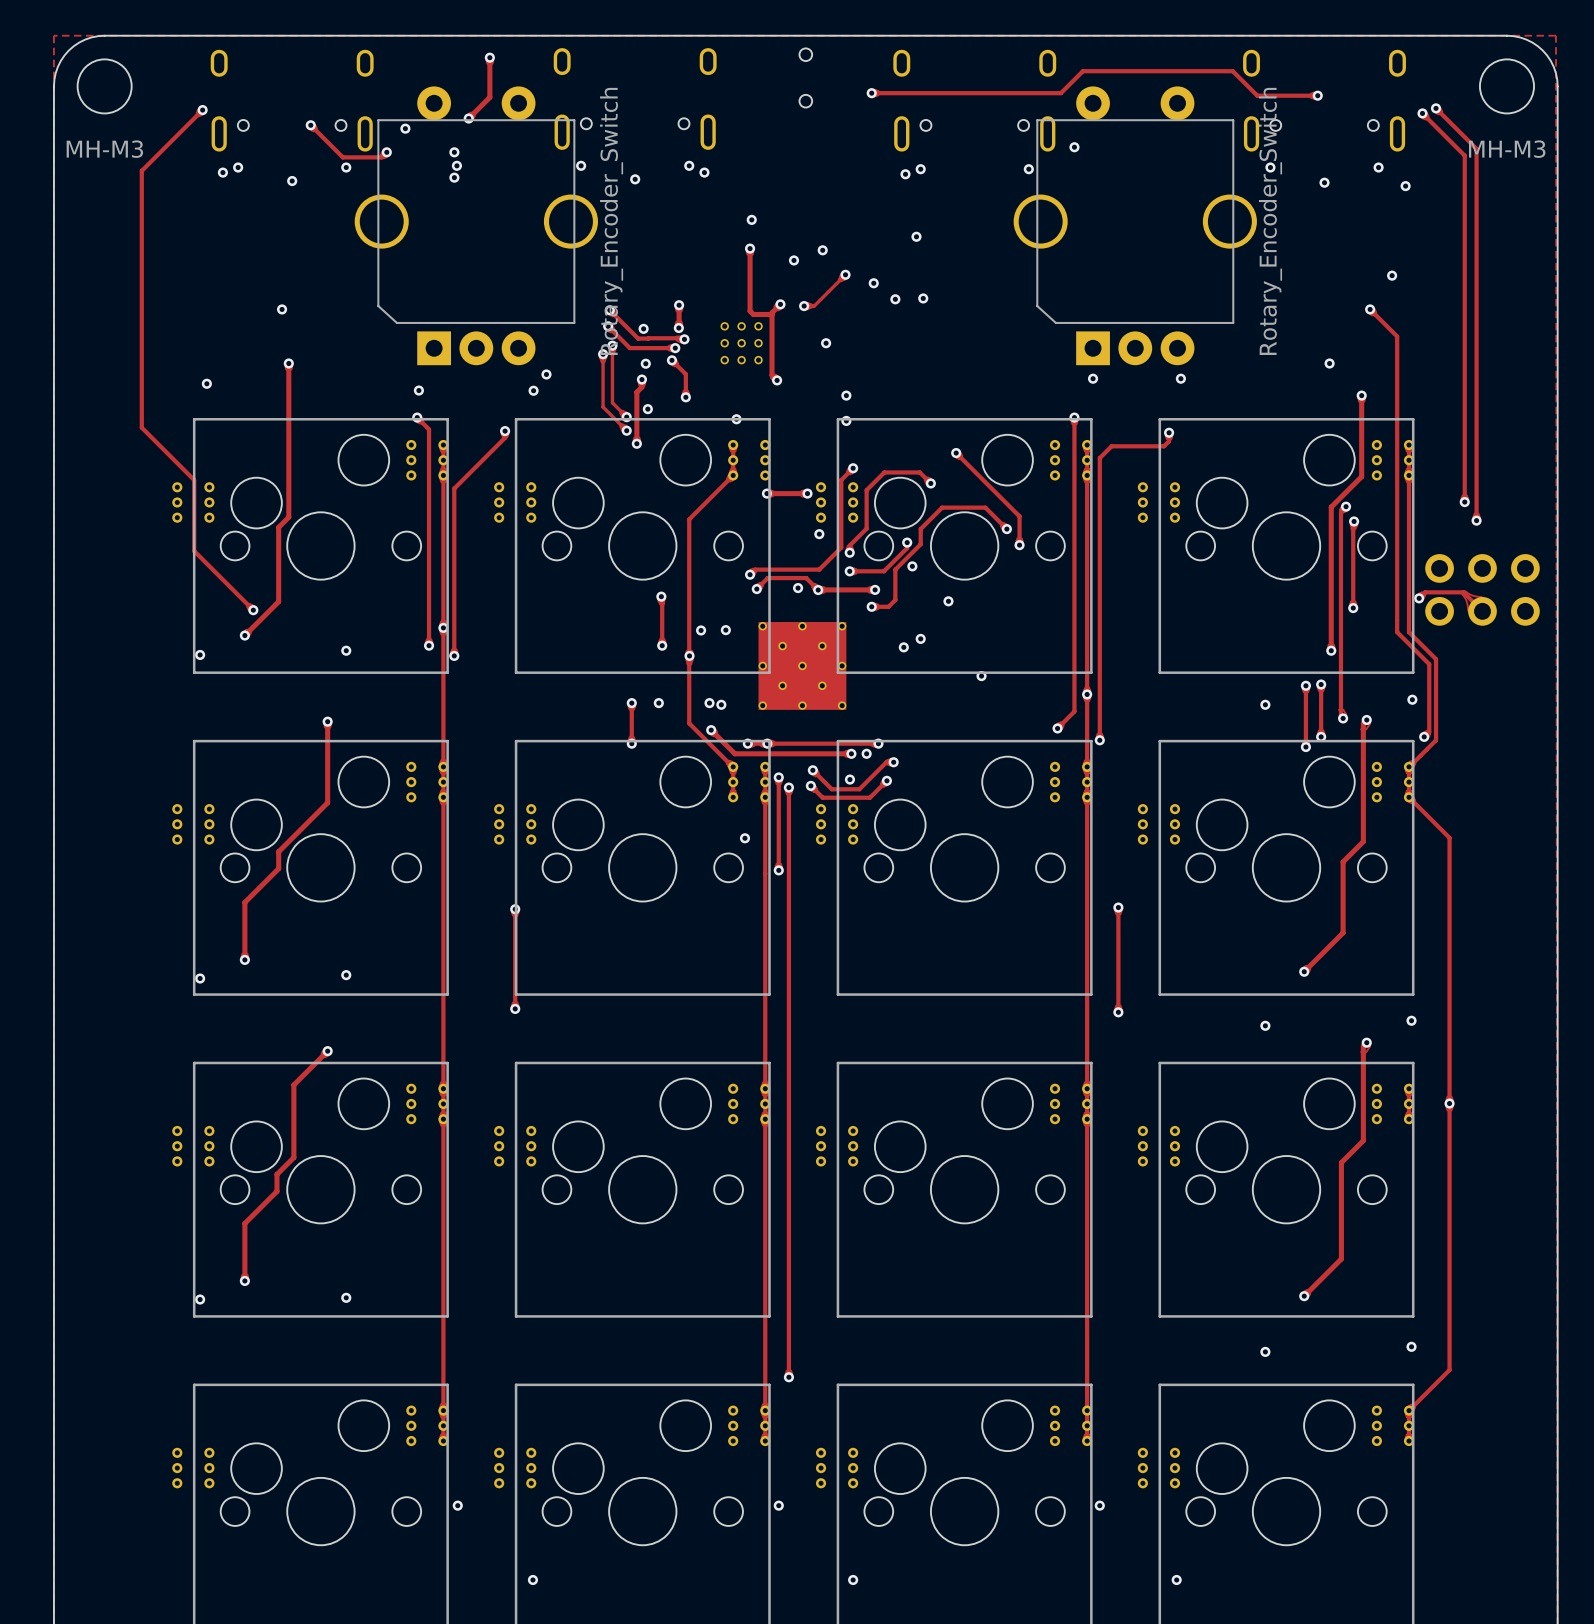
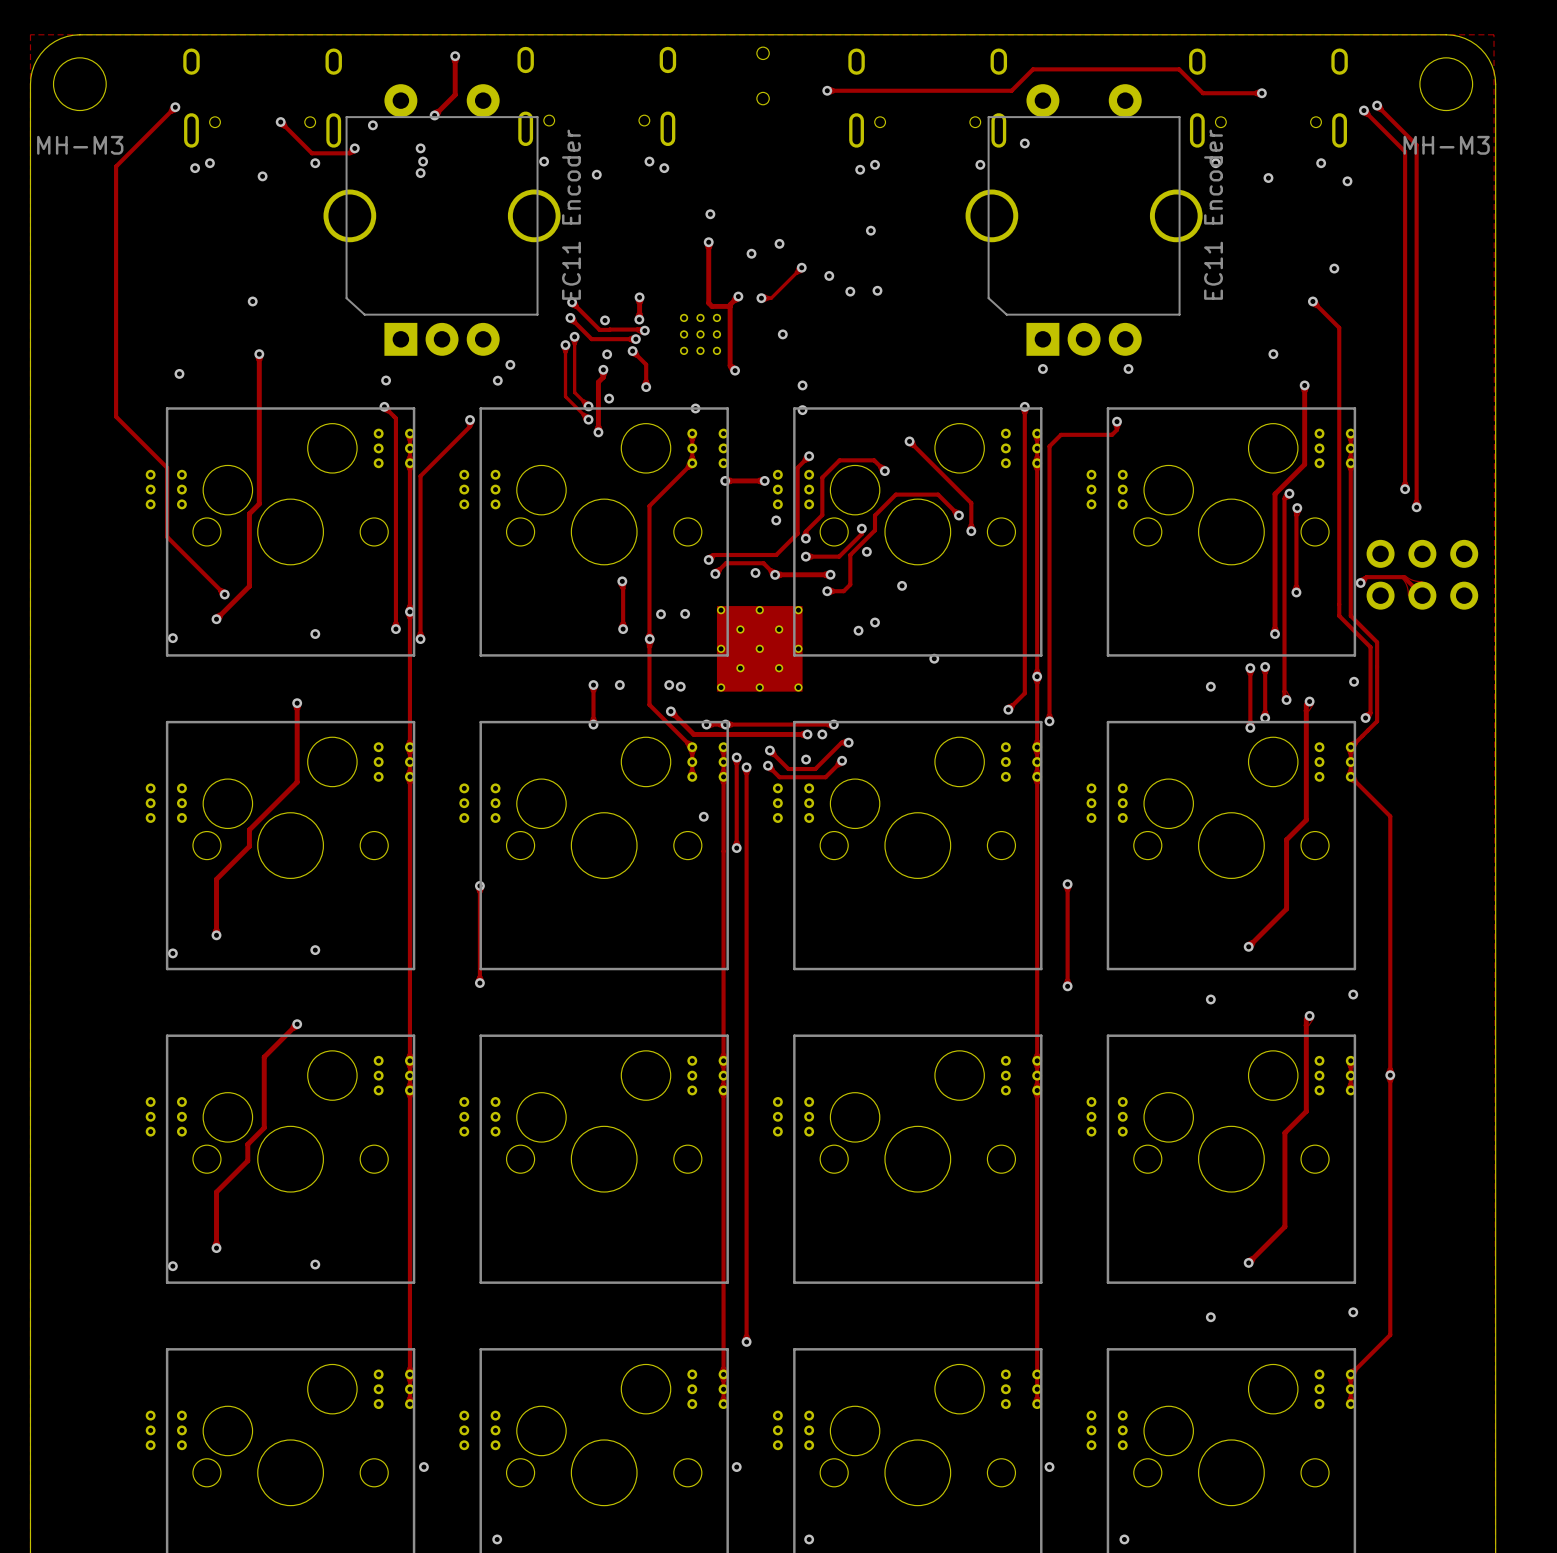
part value: Rotary_Encoder_Switch (611, 221) -> EC11 Encoder (571, 214)
part value: Rotary_Encoder_Switch (1270, 221) -> EC11 Encoder (1213, 214)

